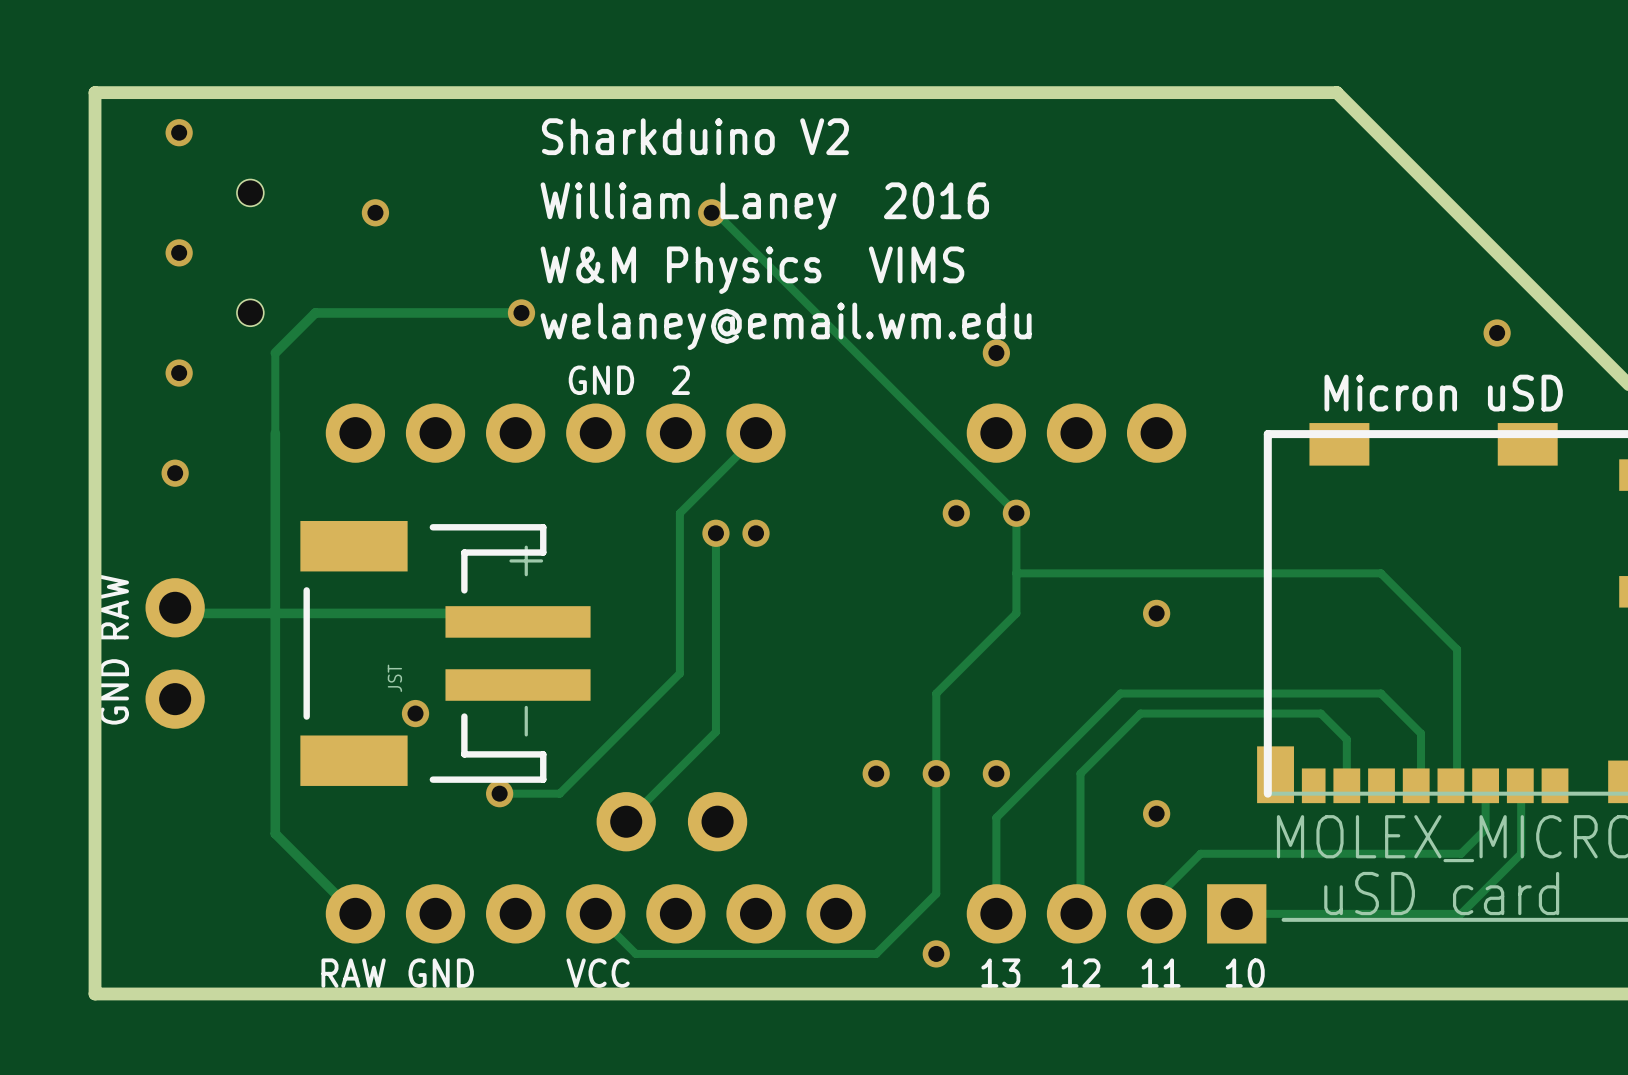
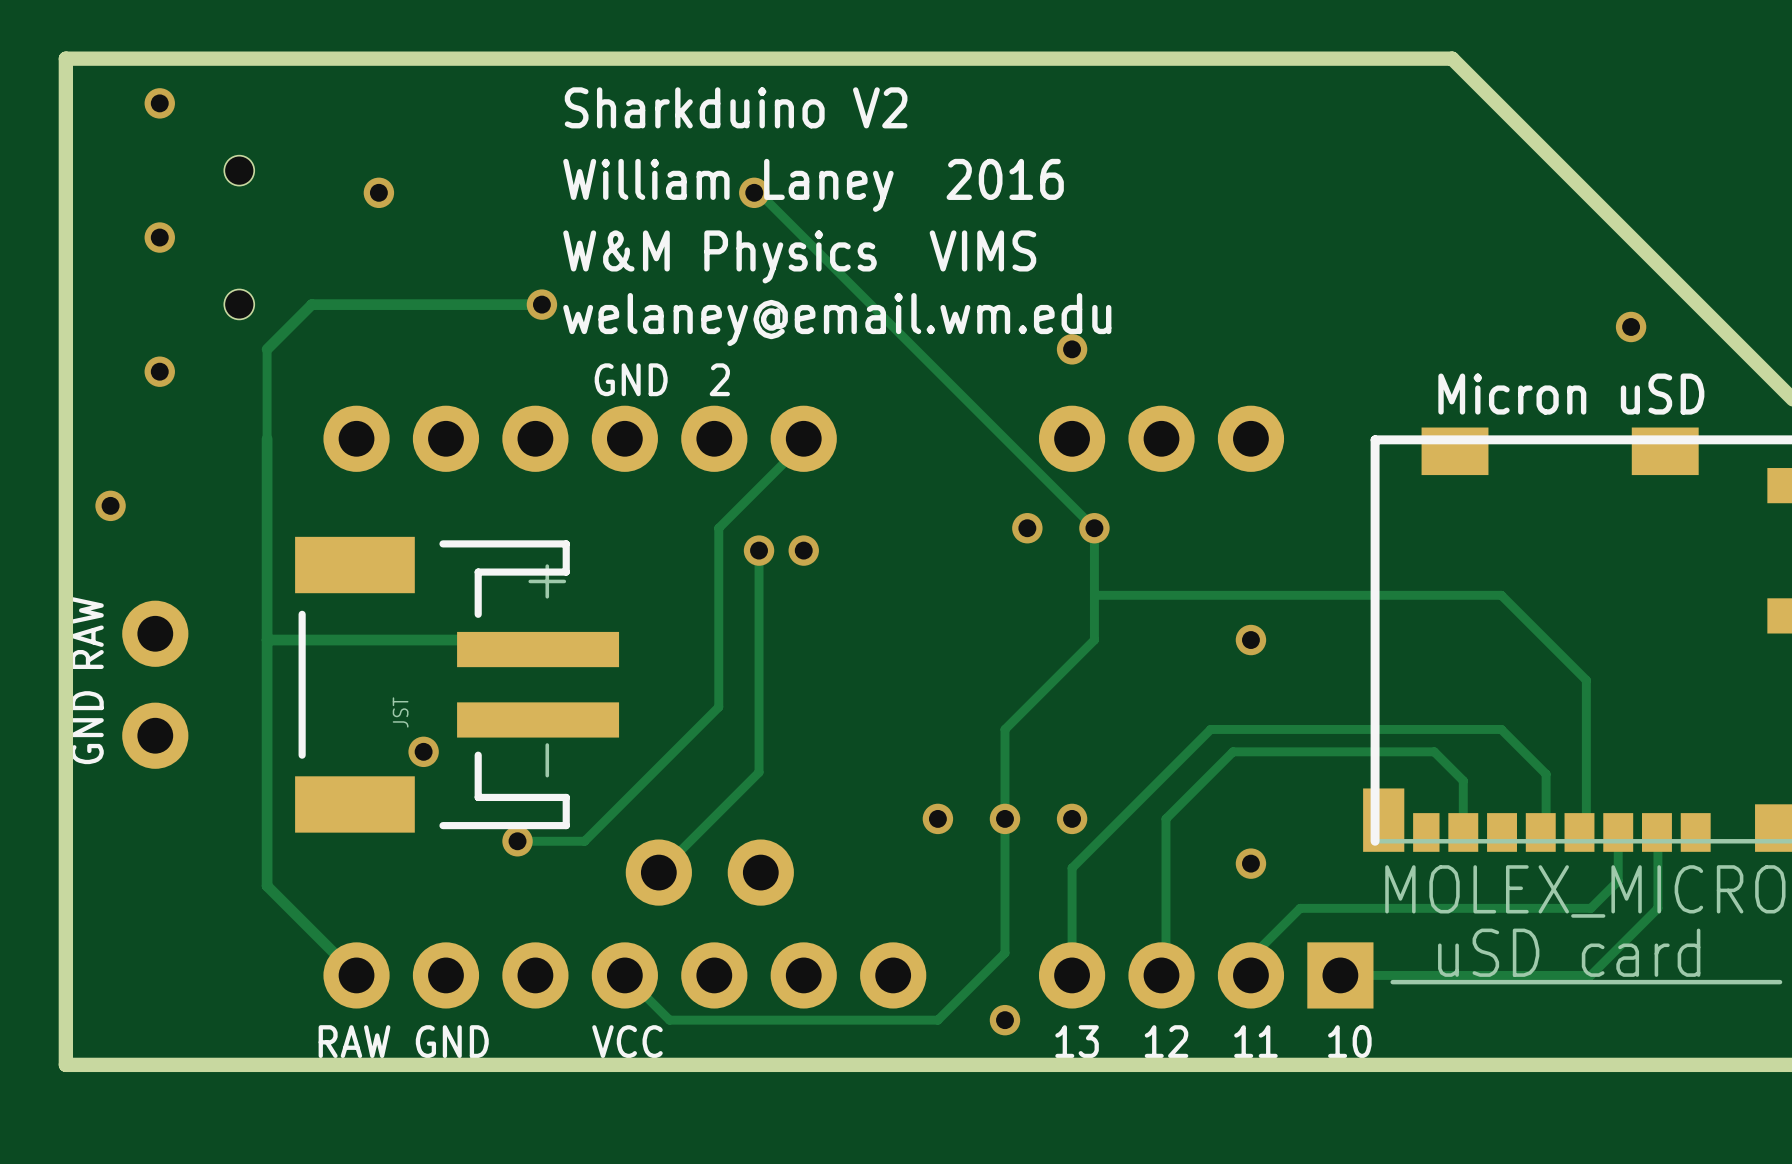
via position: (175, 473) -> (110, 505)
track: (175, 607) (180, 613) (275, 613) -> none

